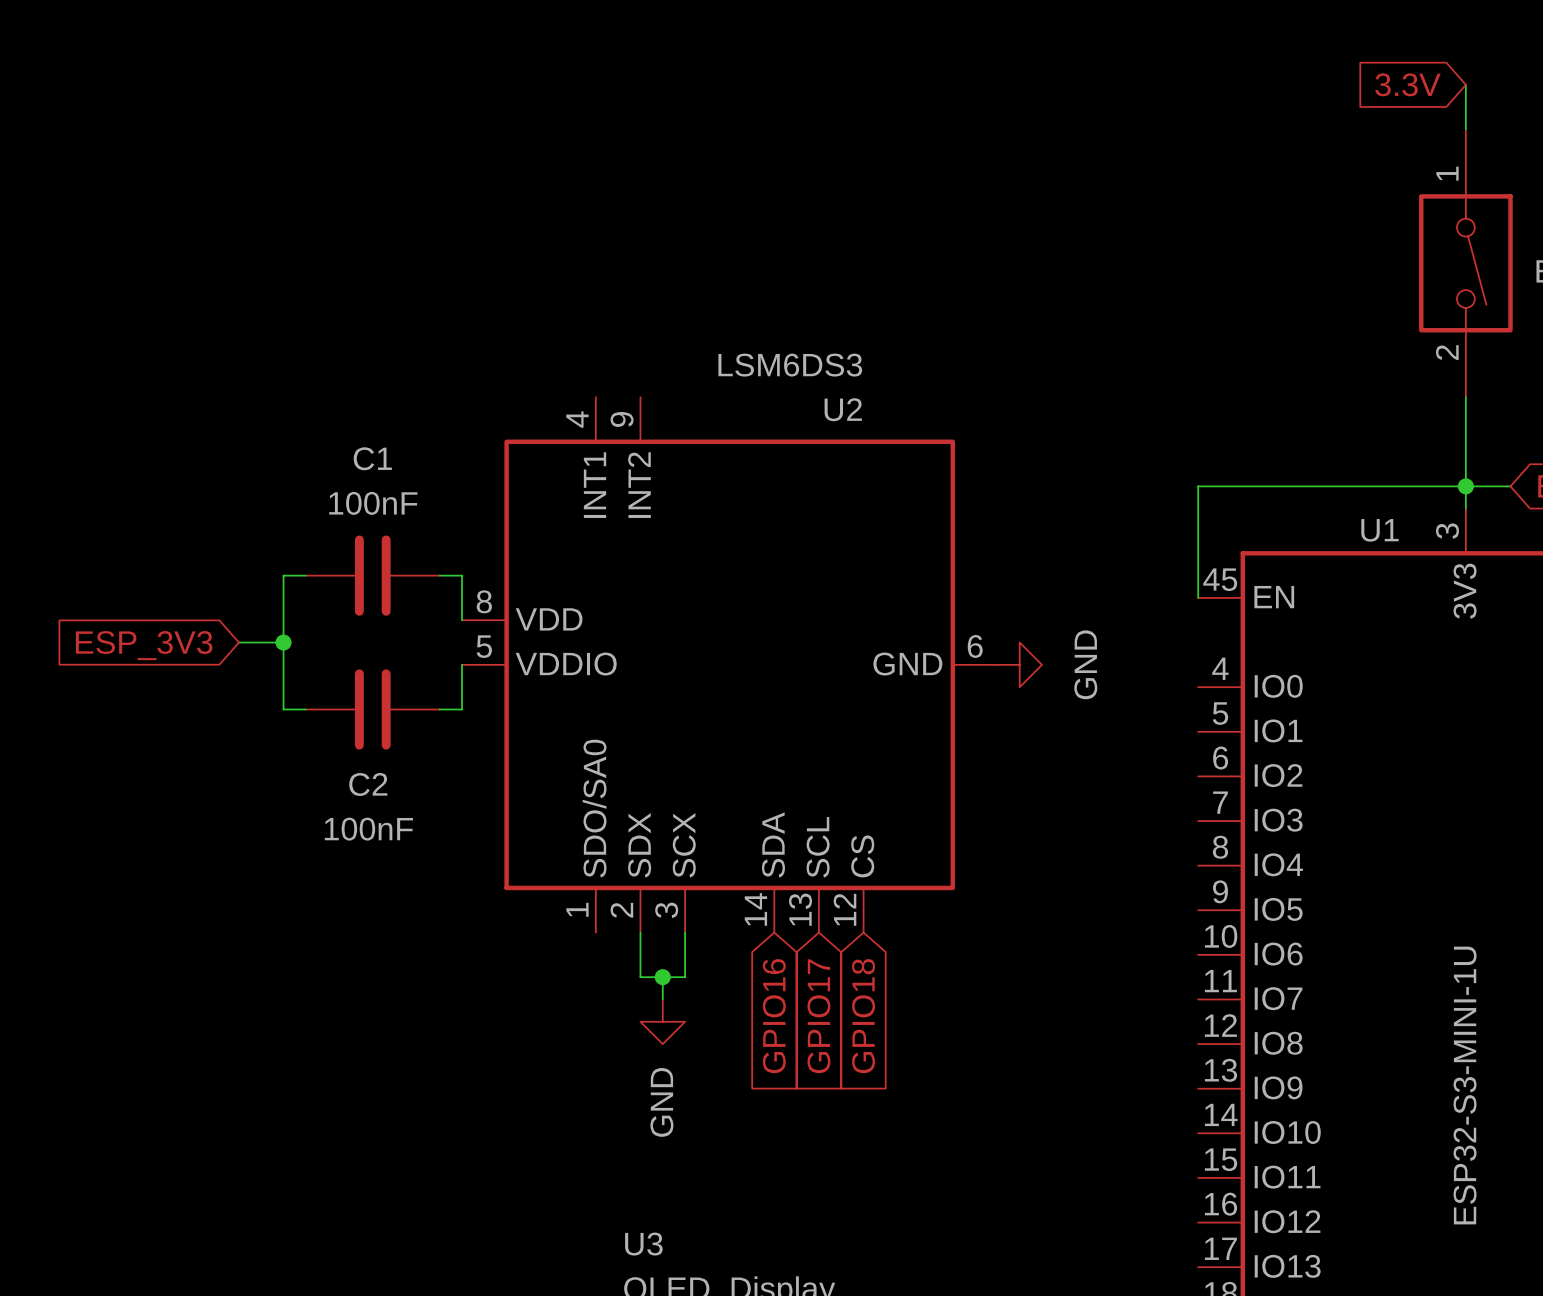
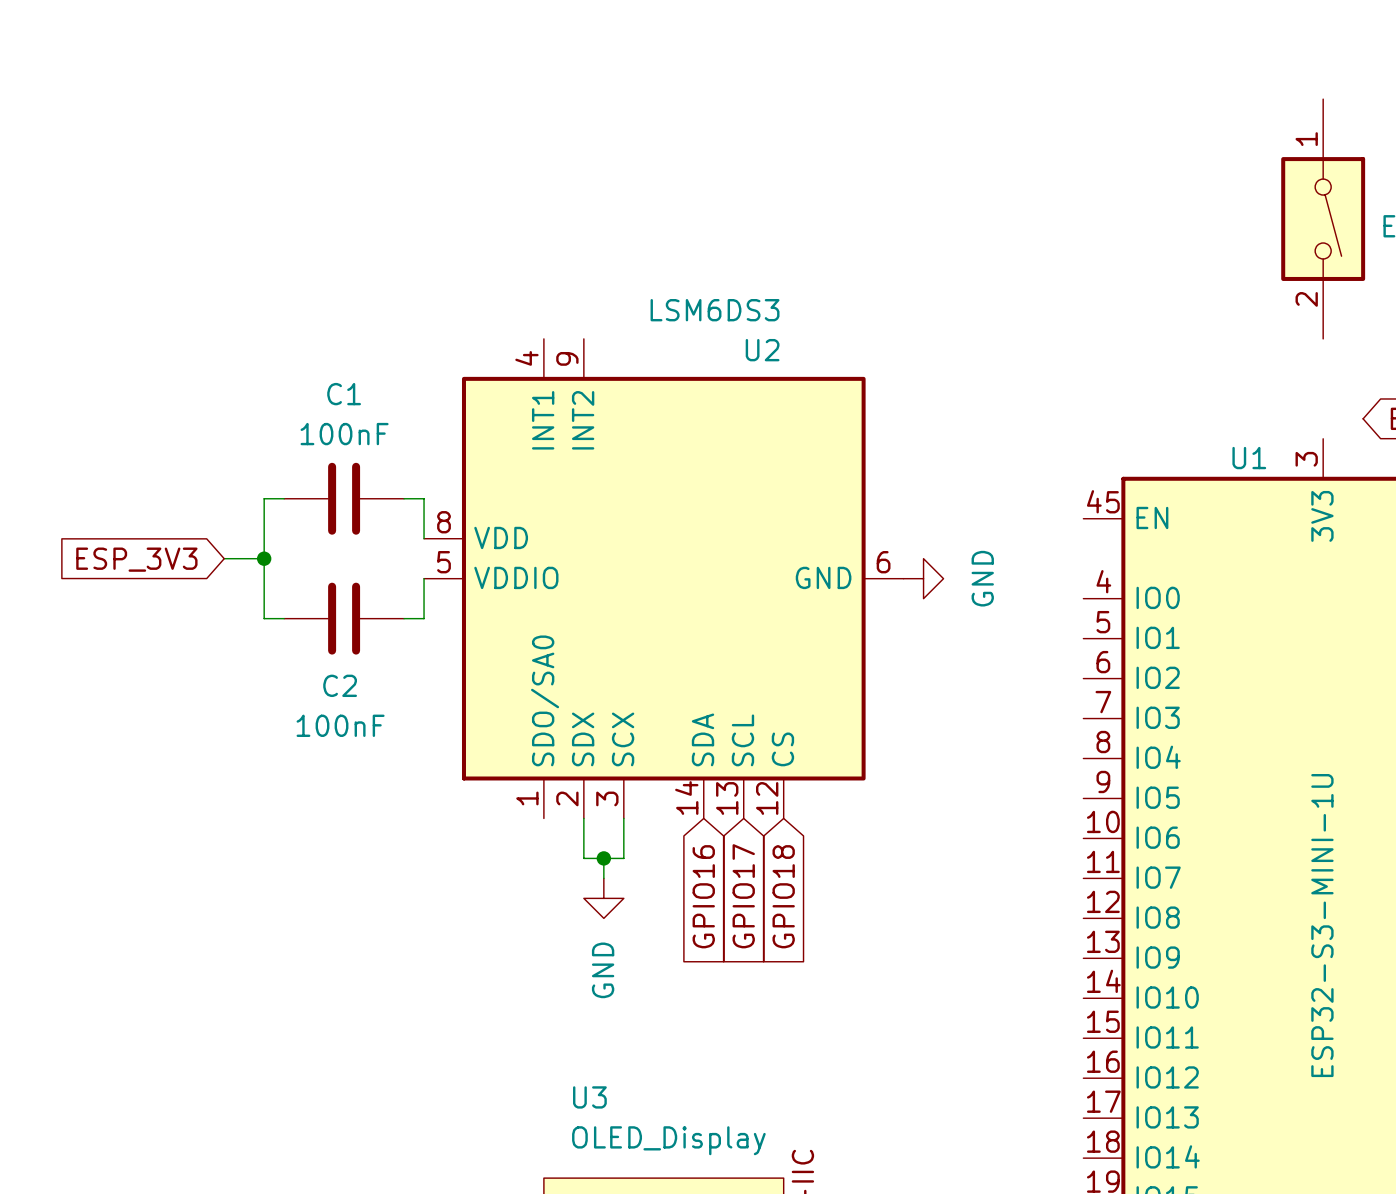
global label: 3.3V (1407, 84) -> none
wire: (1465, 84) (1465, 129) -> none
wire: (1465, 397) (1465, 508) -> none
junction: (1465, 486) -> none
wire: (1510, 486) (1198, 486) (1198, 597) -> none

